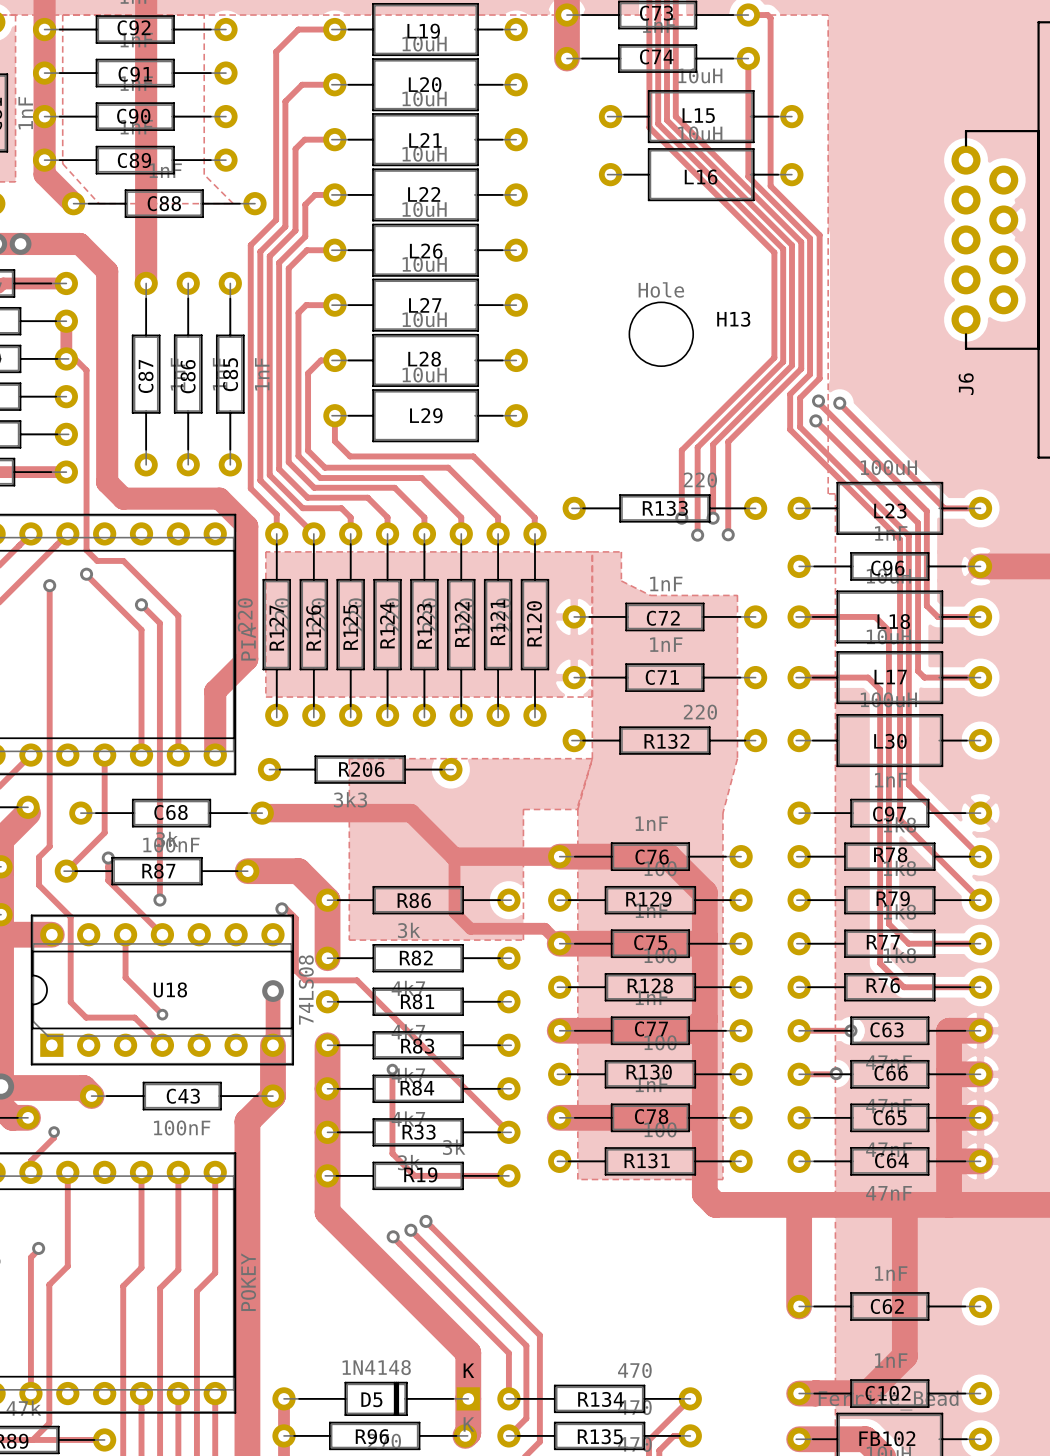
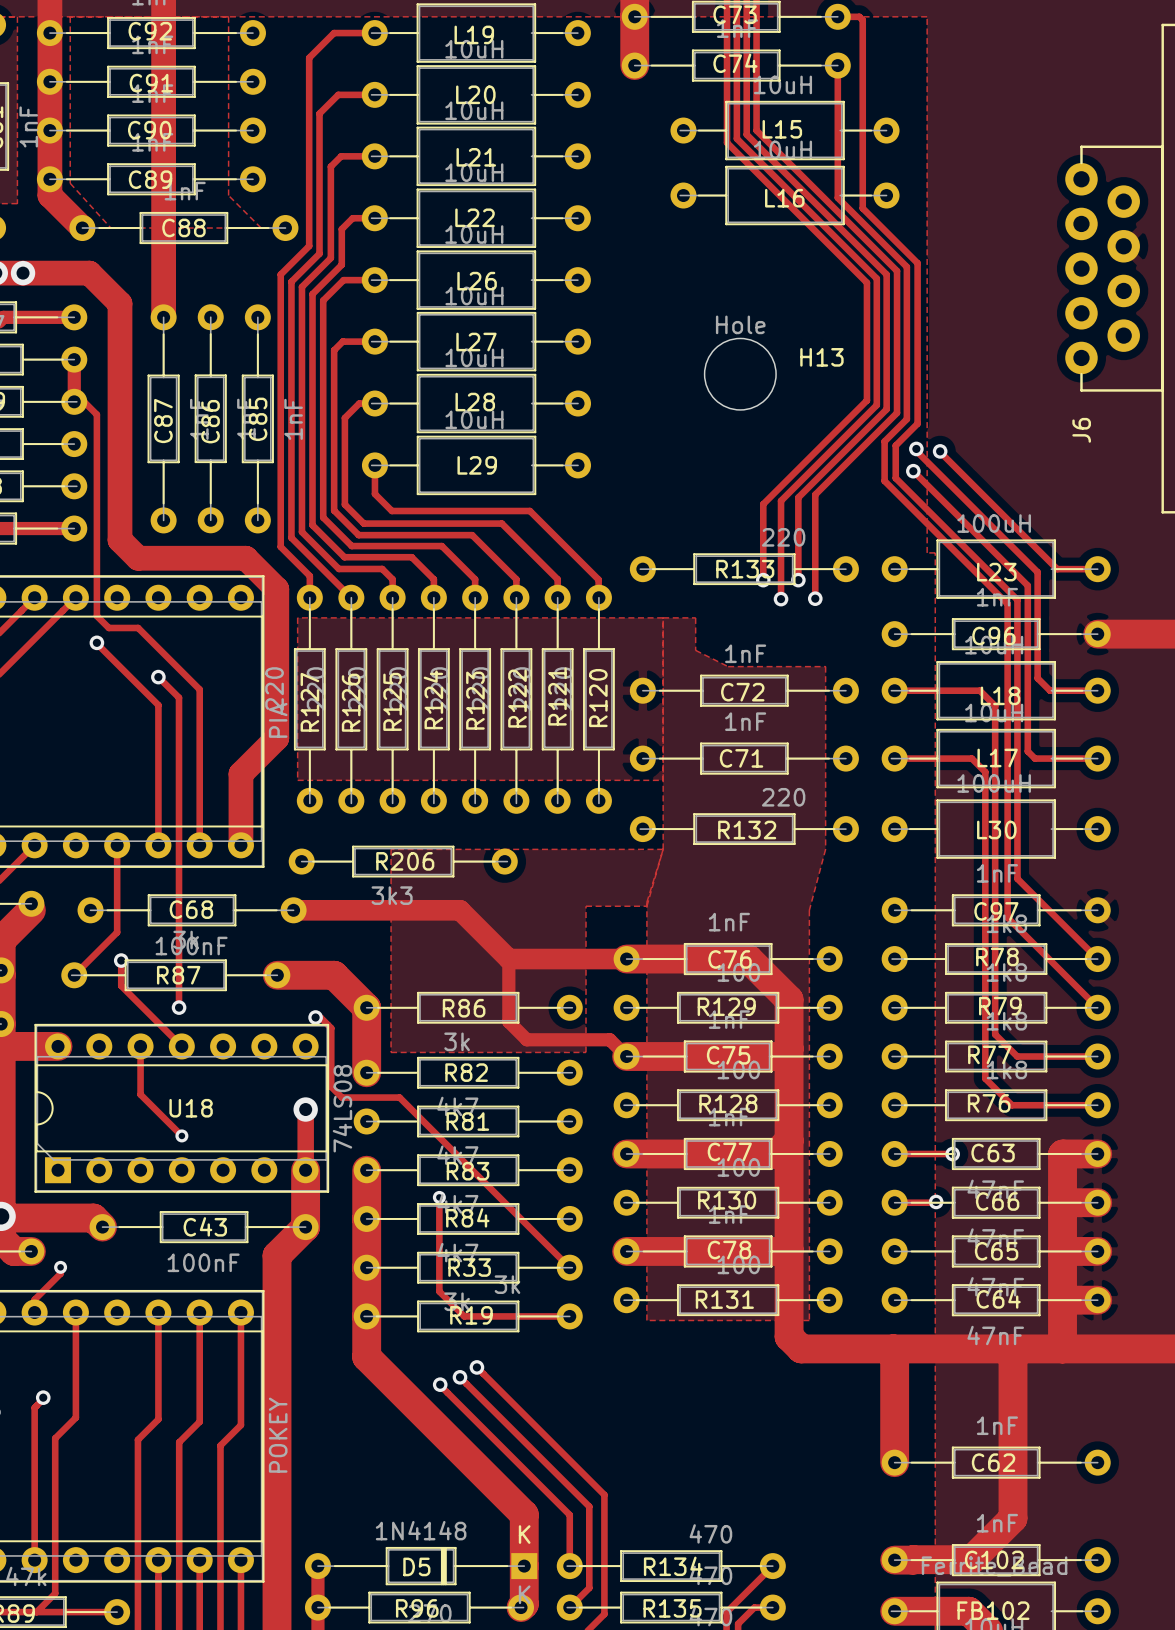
track: (49, 585) (49, 846) (39, 857) (39, 885) (70, 916) (70, 1002) (86, 1017) (134, 1017) (162, 1045) -> none
via: (49, 585) -> none

